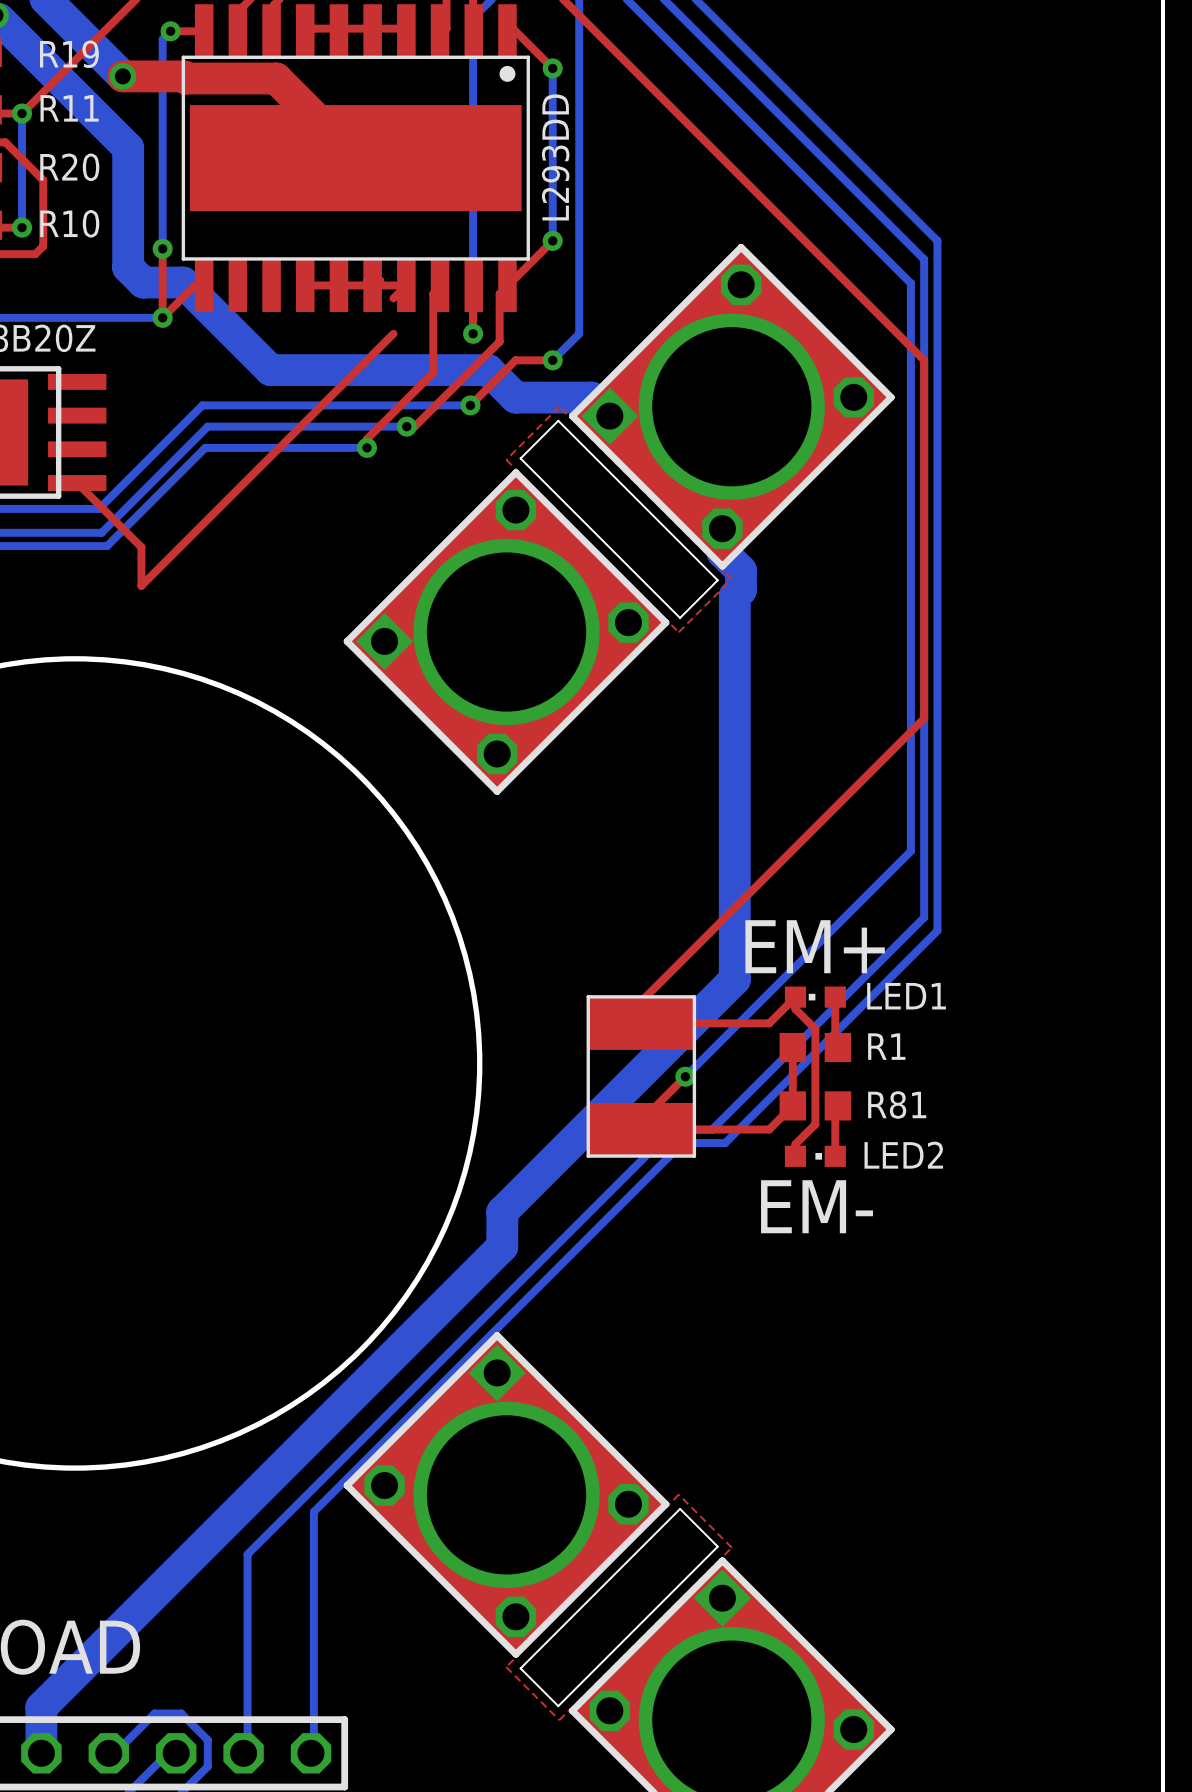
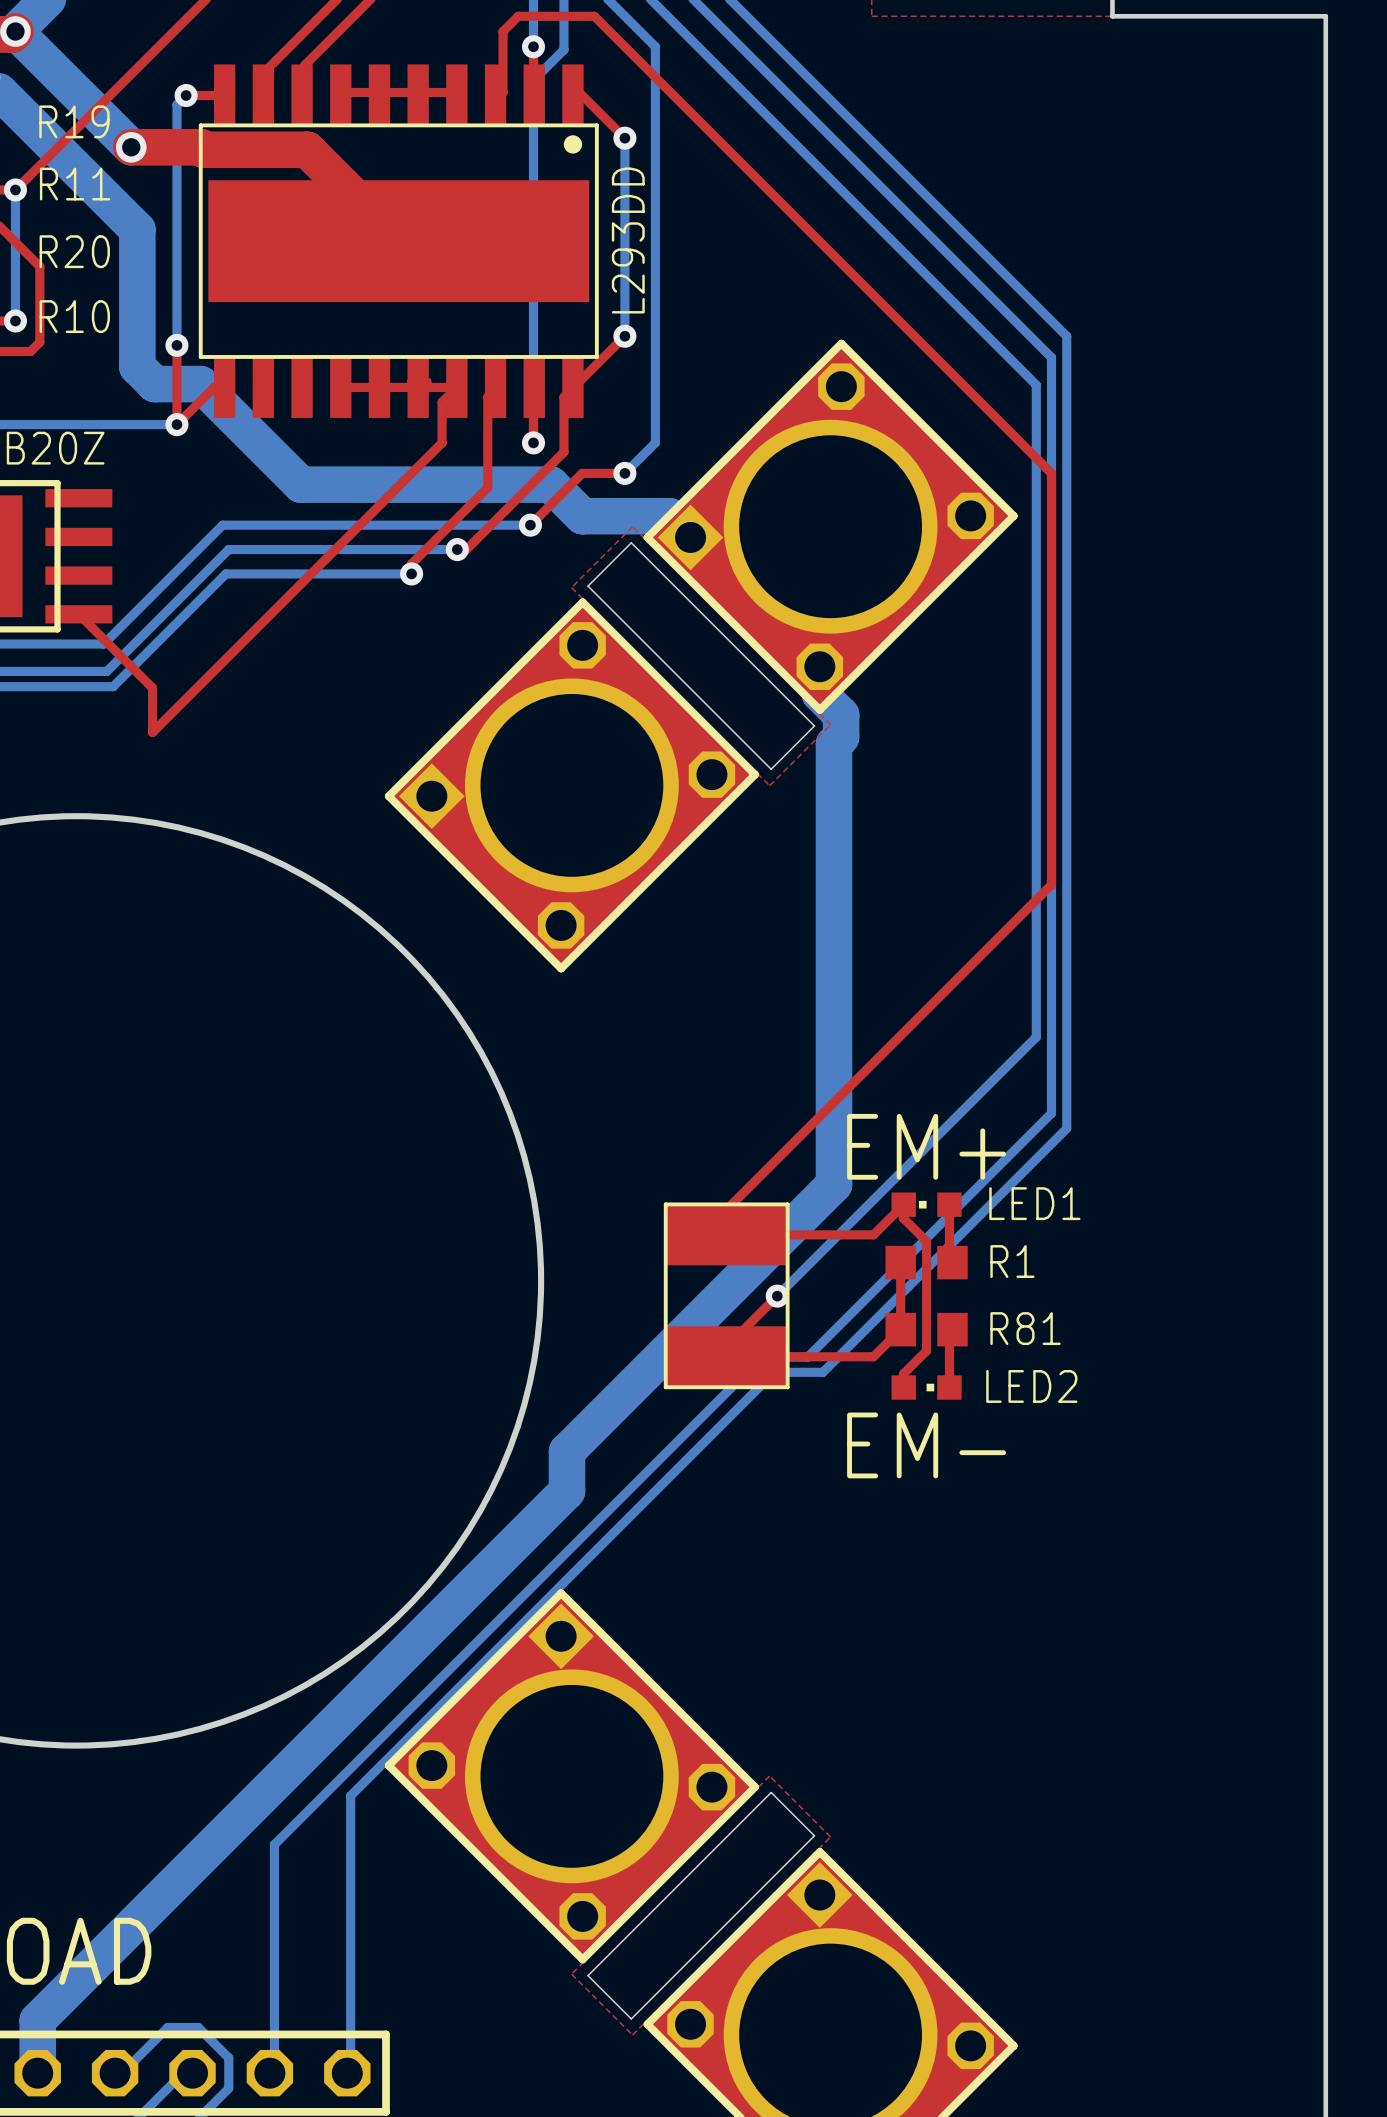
top track: none -> (442, 402) (442, 442)

